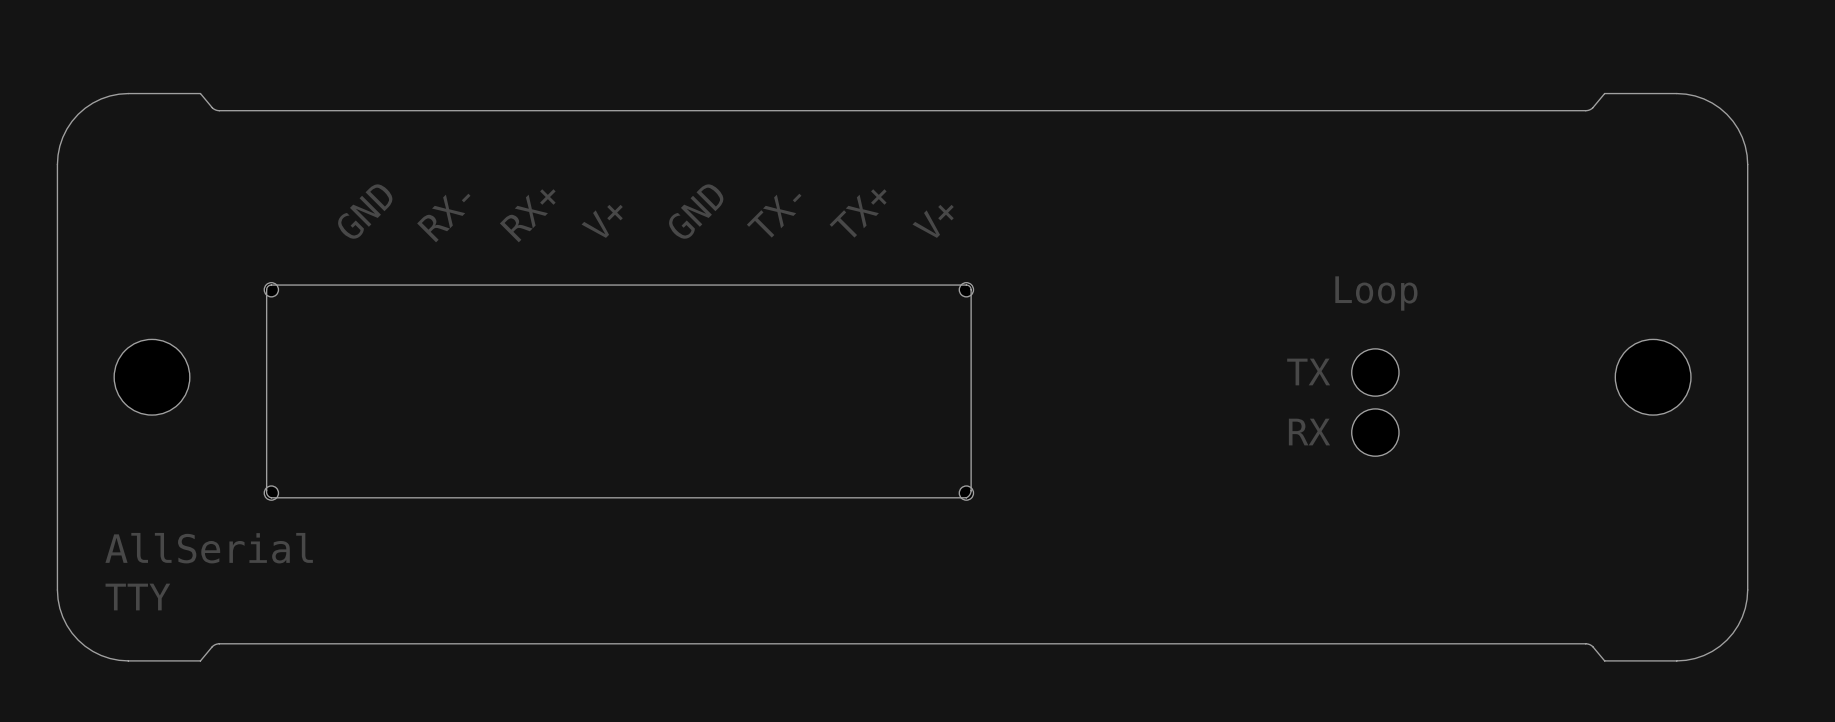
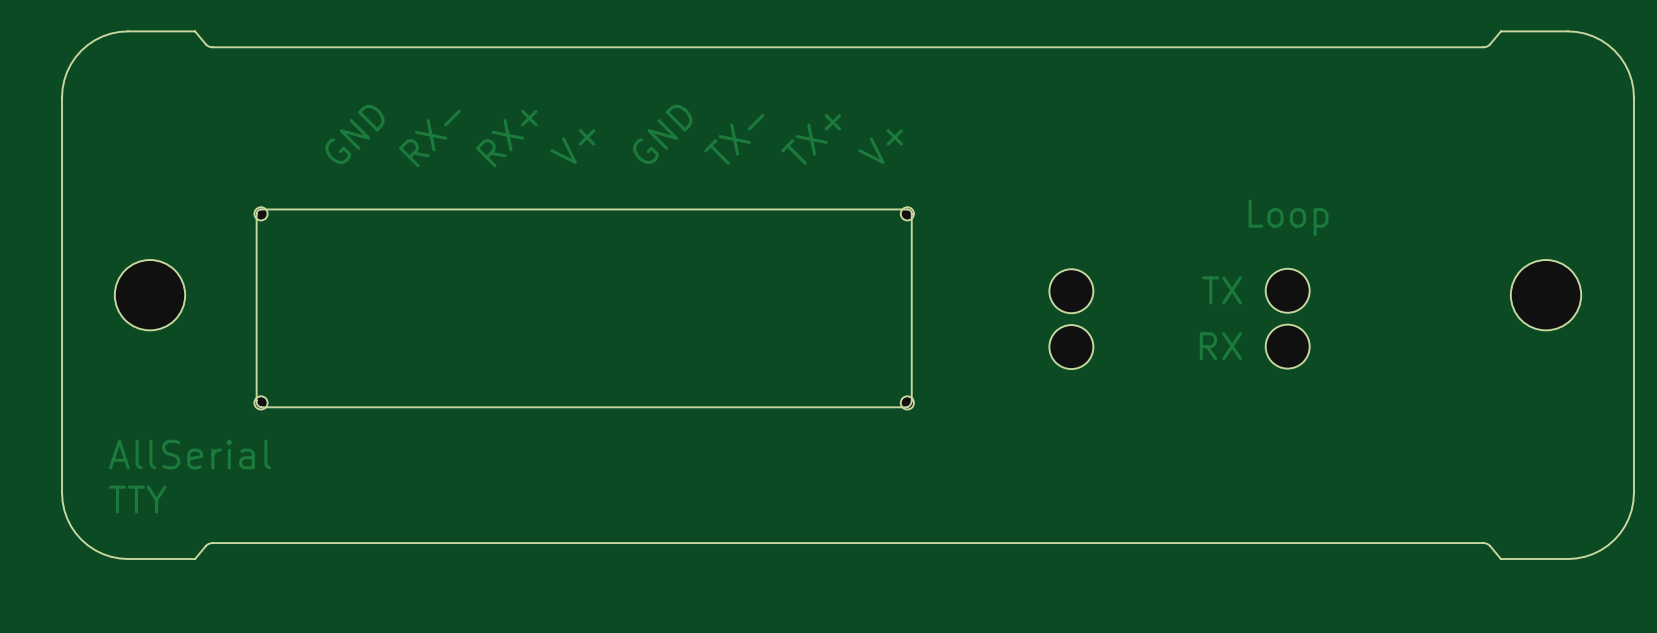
part: none -> (1071, 291)
part: none -> (1071, 347)

